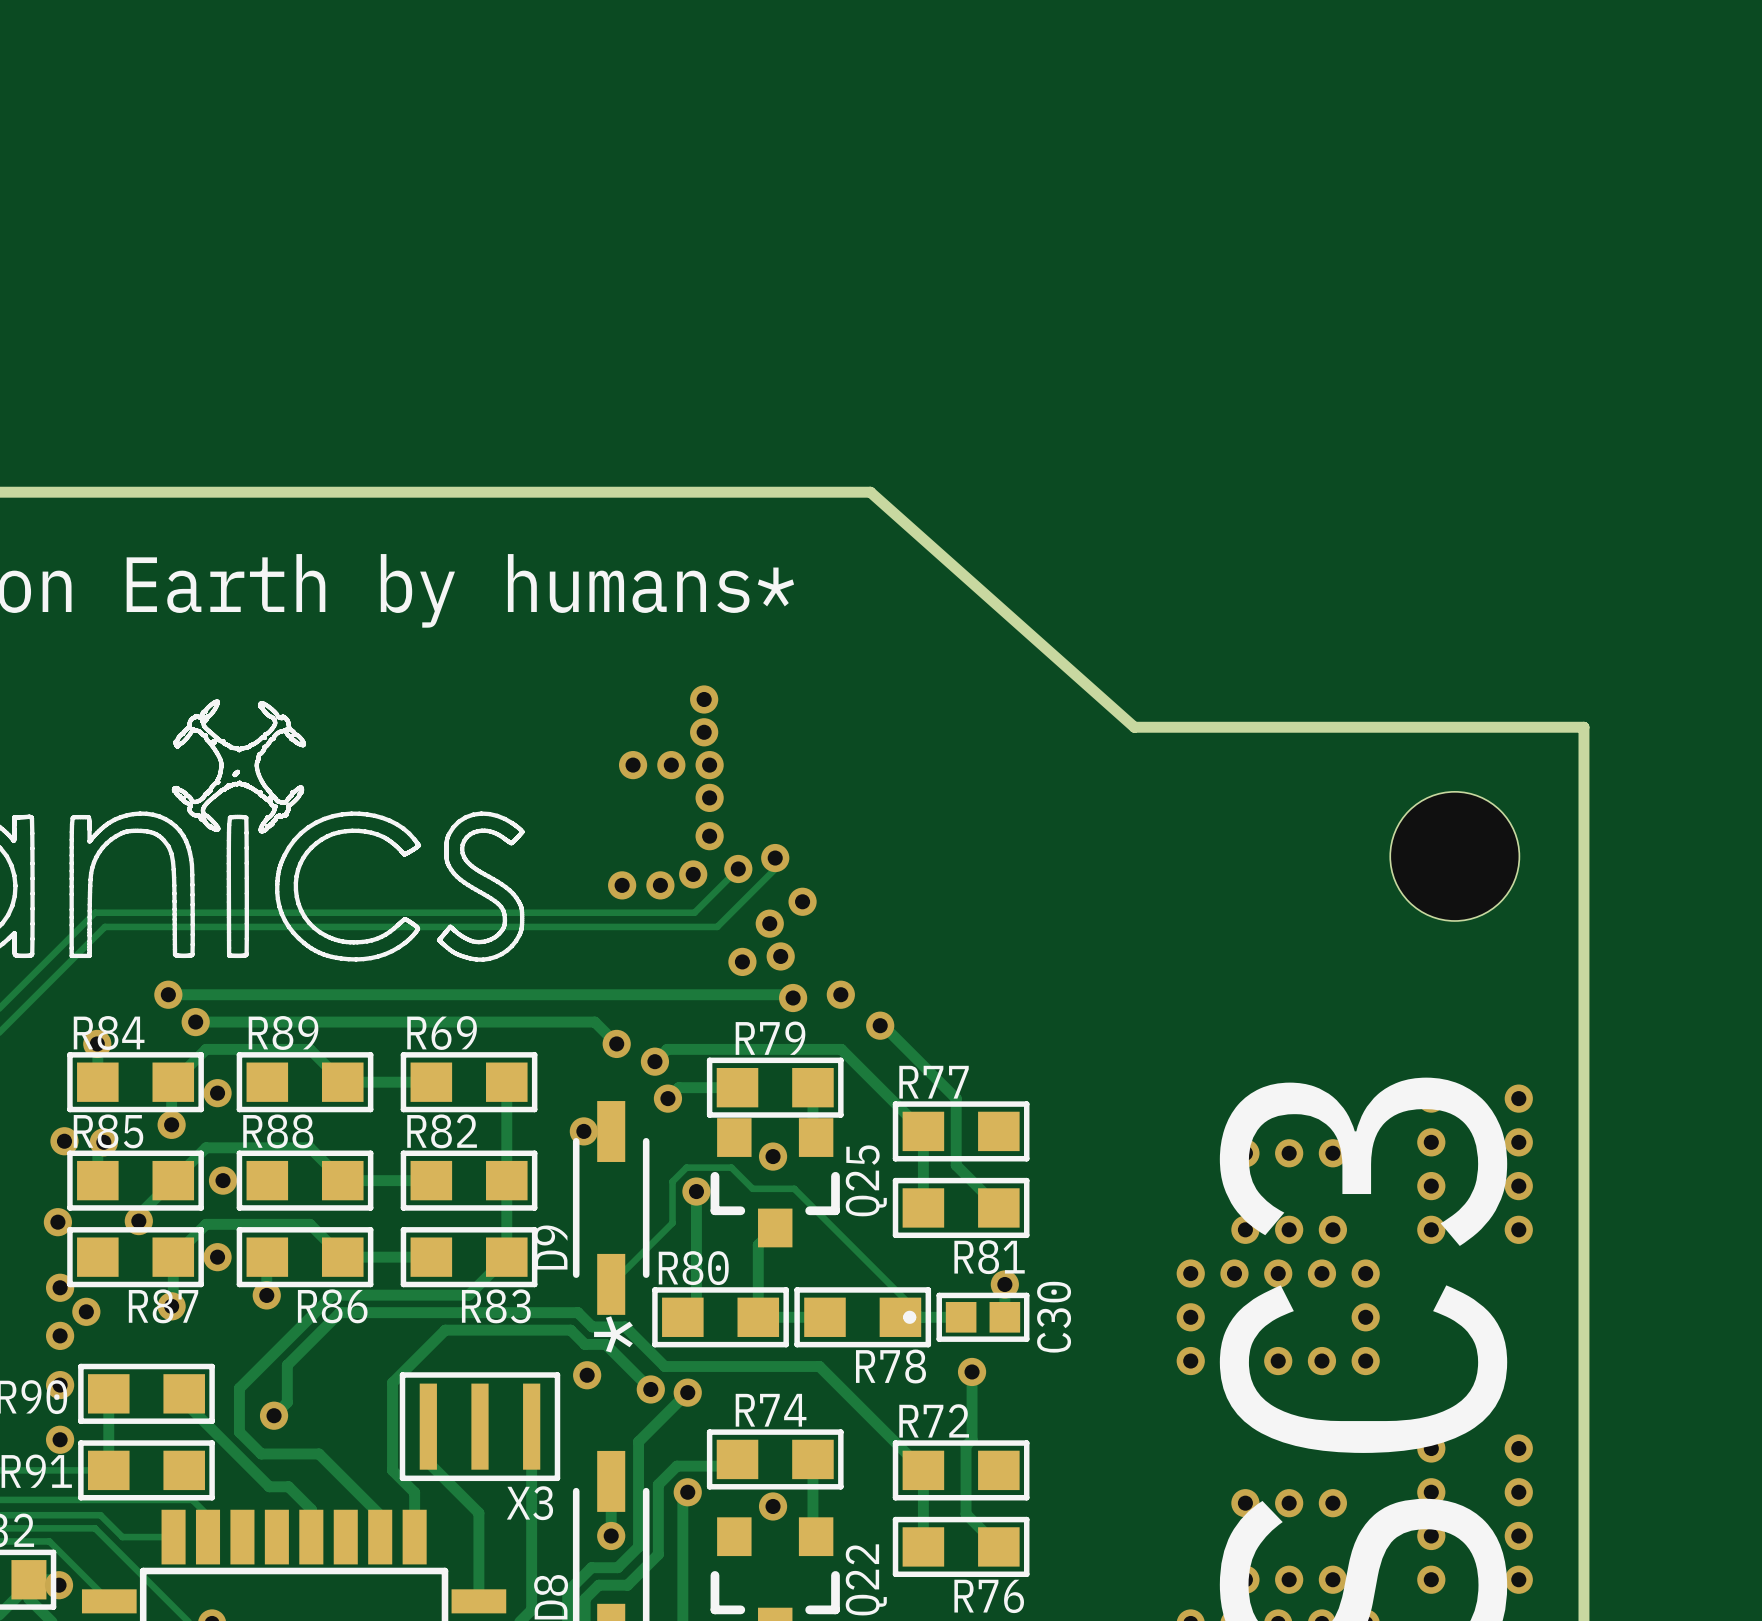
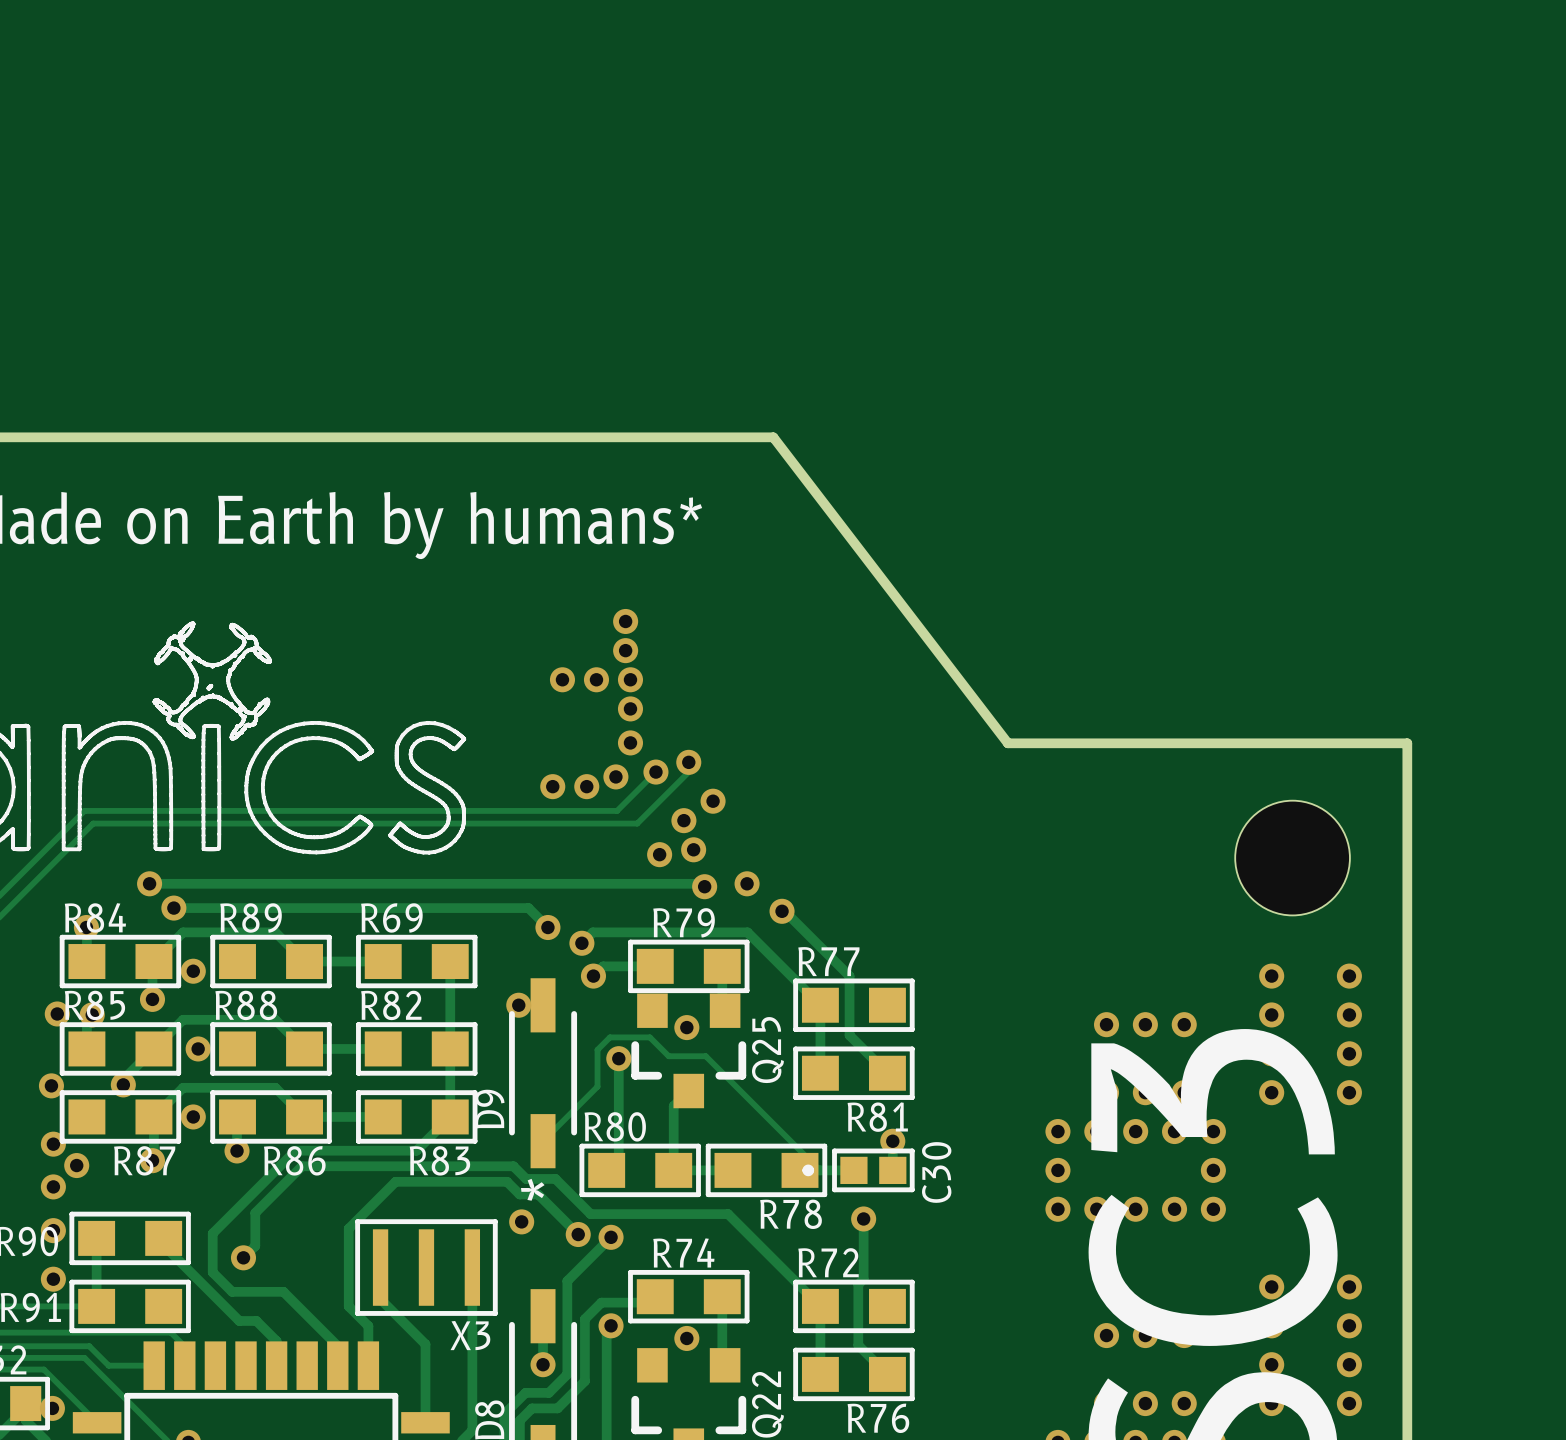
board edge: (870, 492) (1134, 727) (1583, 727) (1583, 836) -> (773, 437) (1007, 743) (1407, 743)
hole position: (1454, 856) -> (1292, 858)

